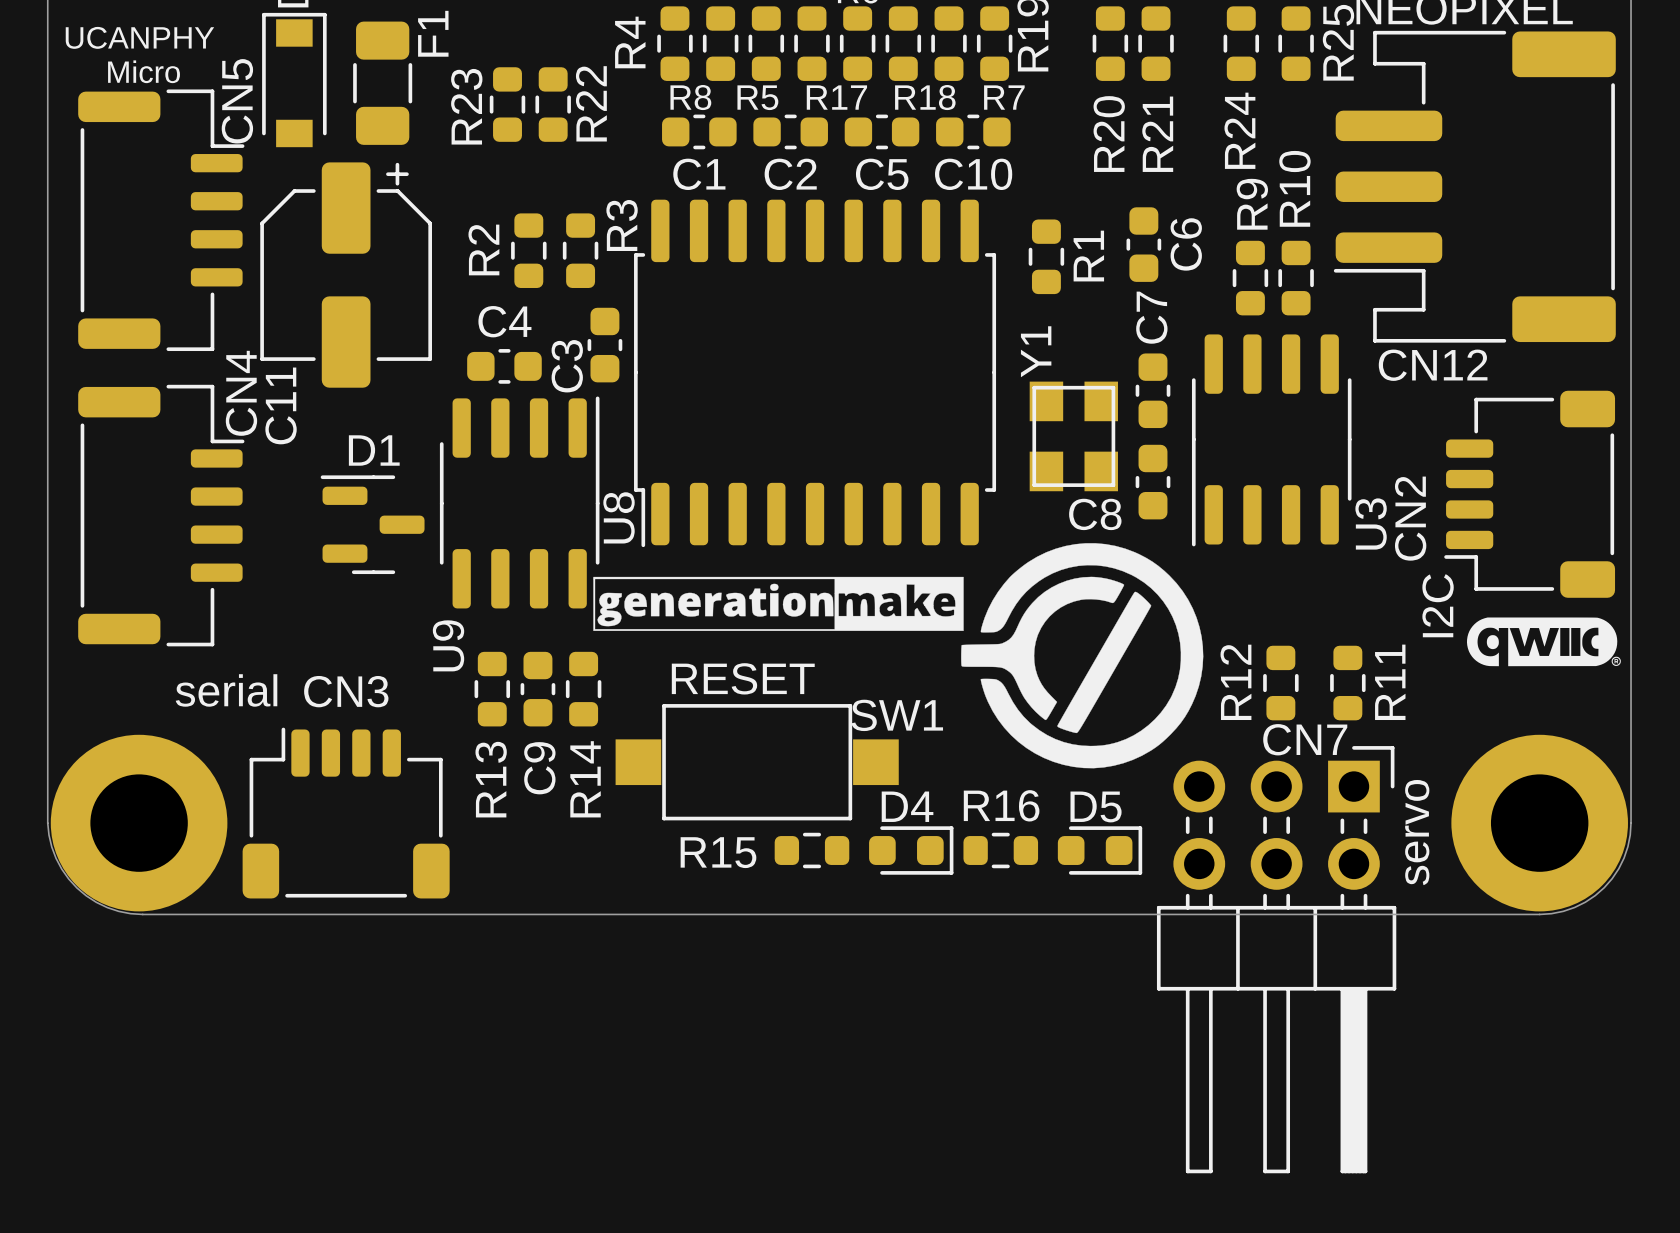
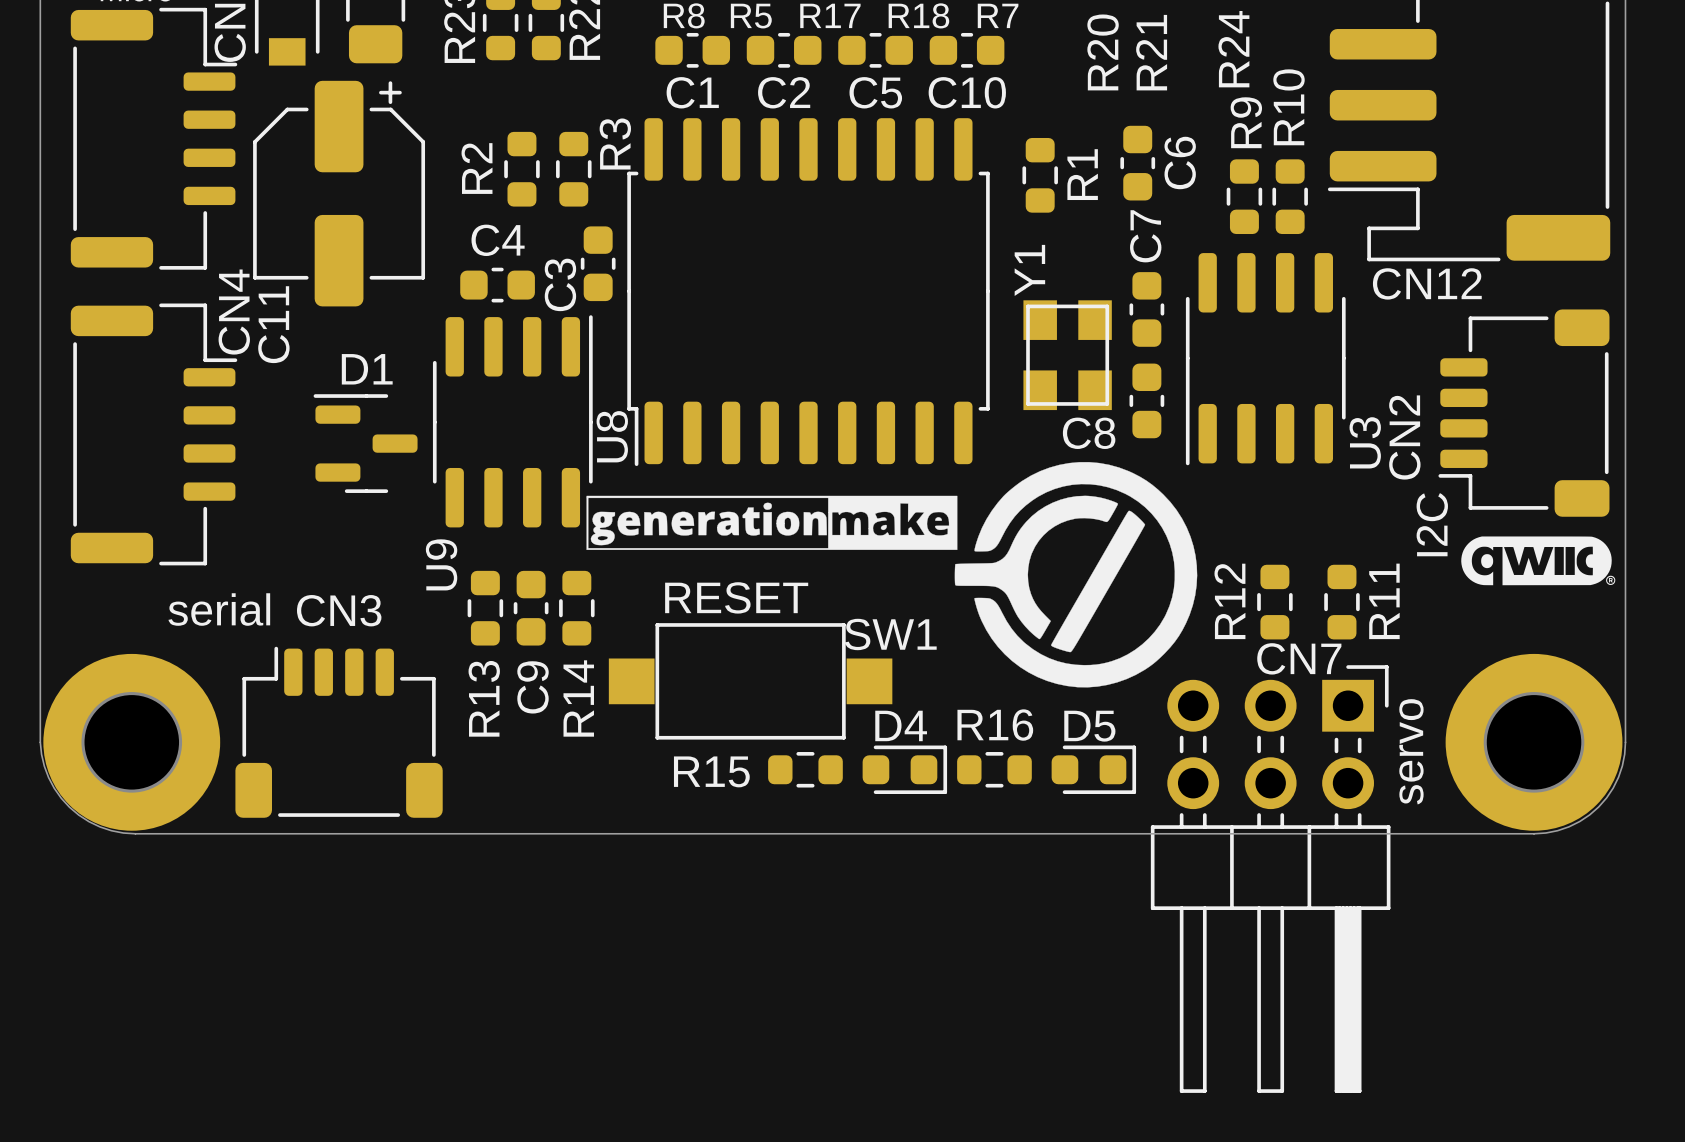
drawing: none -> [81, 692, 183, 793]
drawing: none -> [1483, 692, 1585, 793]

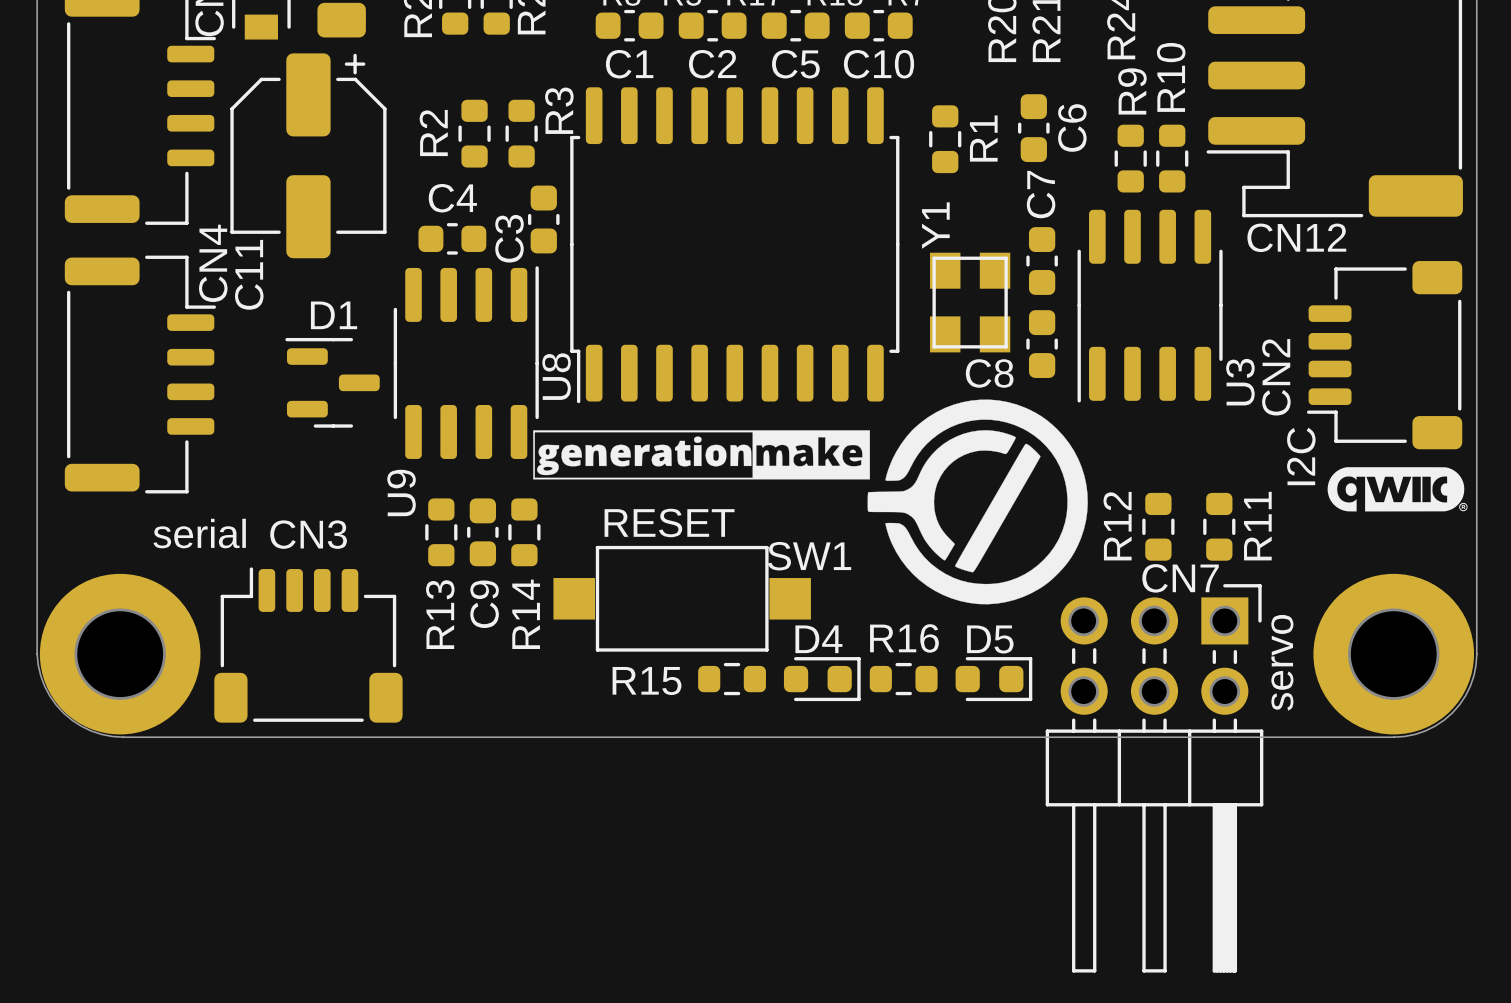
drawing: none -> [1068, 605, 1099, 637]
drawing: none -> [1139, 605, 1170, 637]
drawing: none -> [1209, 605, 1241, 637]
drawing: none -> [1068, 676, 1099, 707]
drawing: none -> [1139, 676, 1170, 707]
drawing: none -> [1209, 676, 1241, 707]

